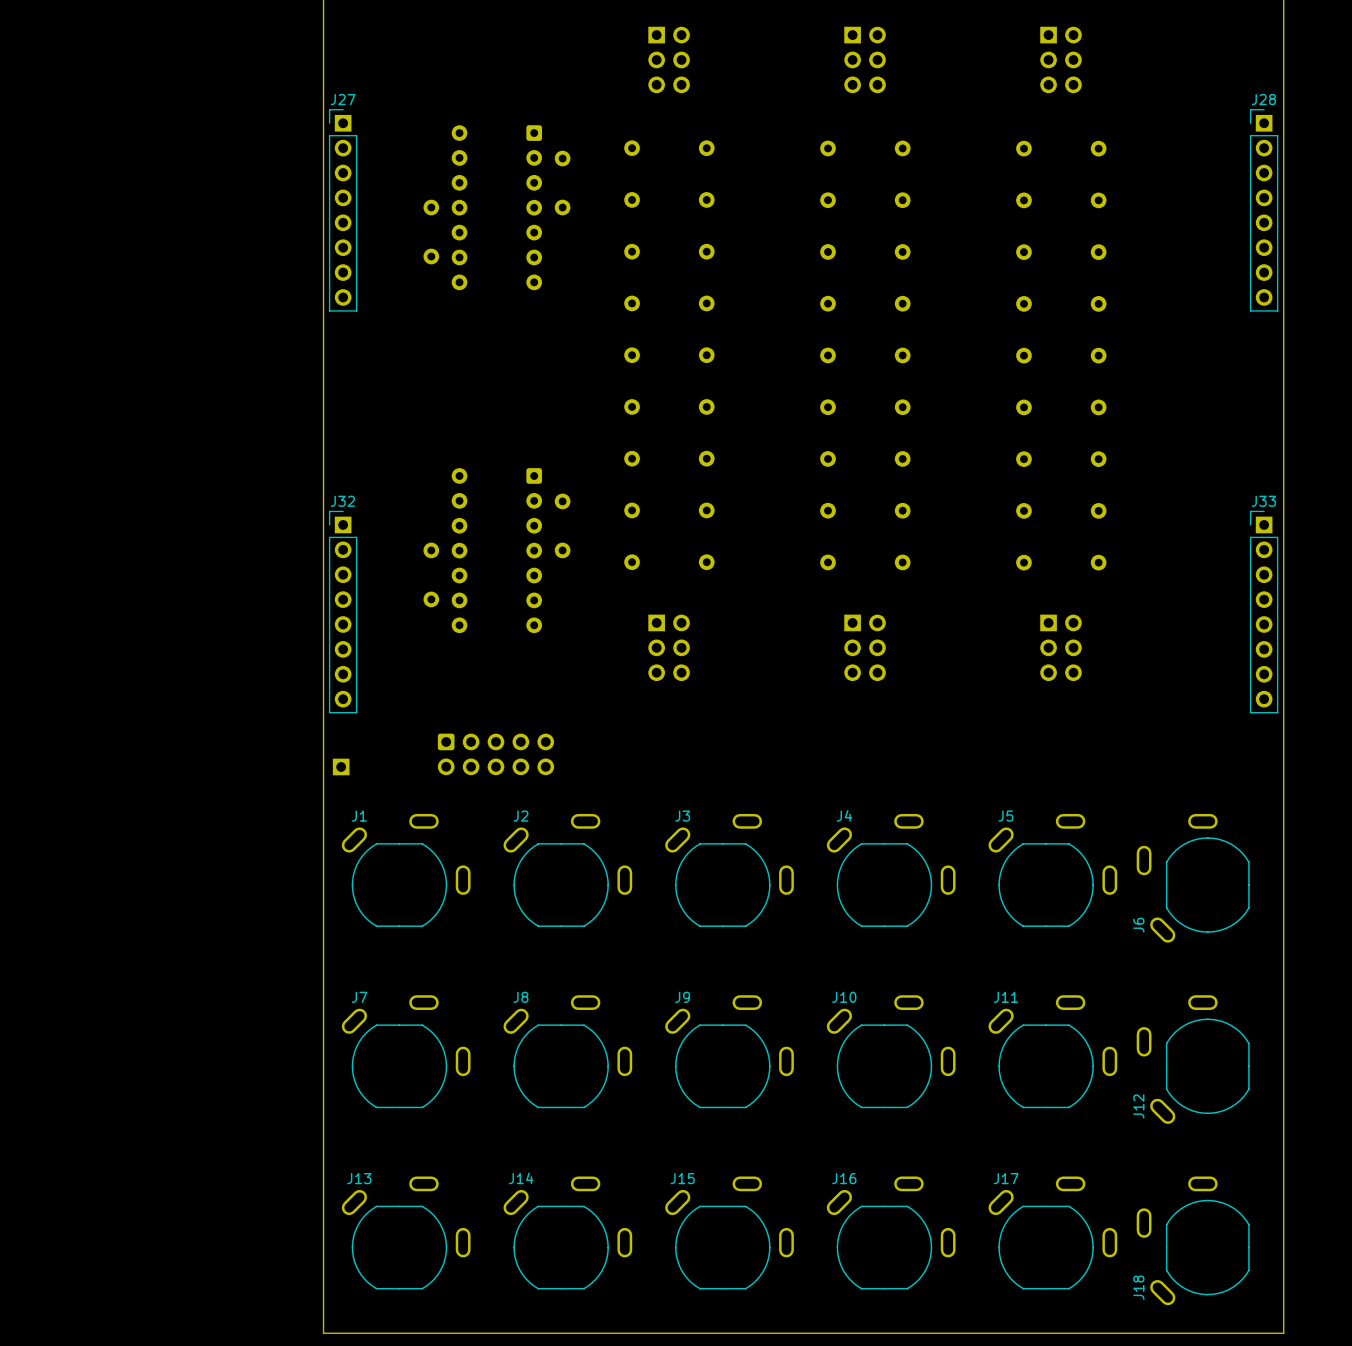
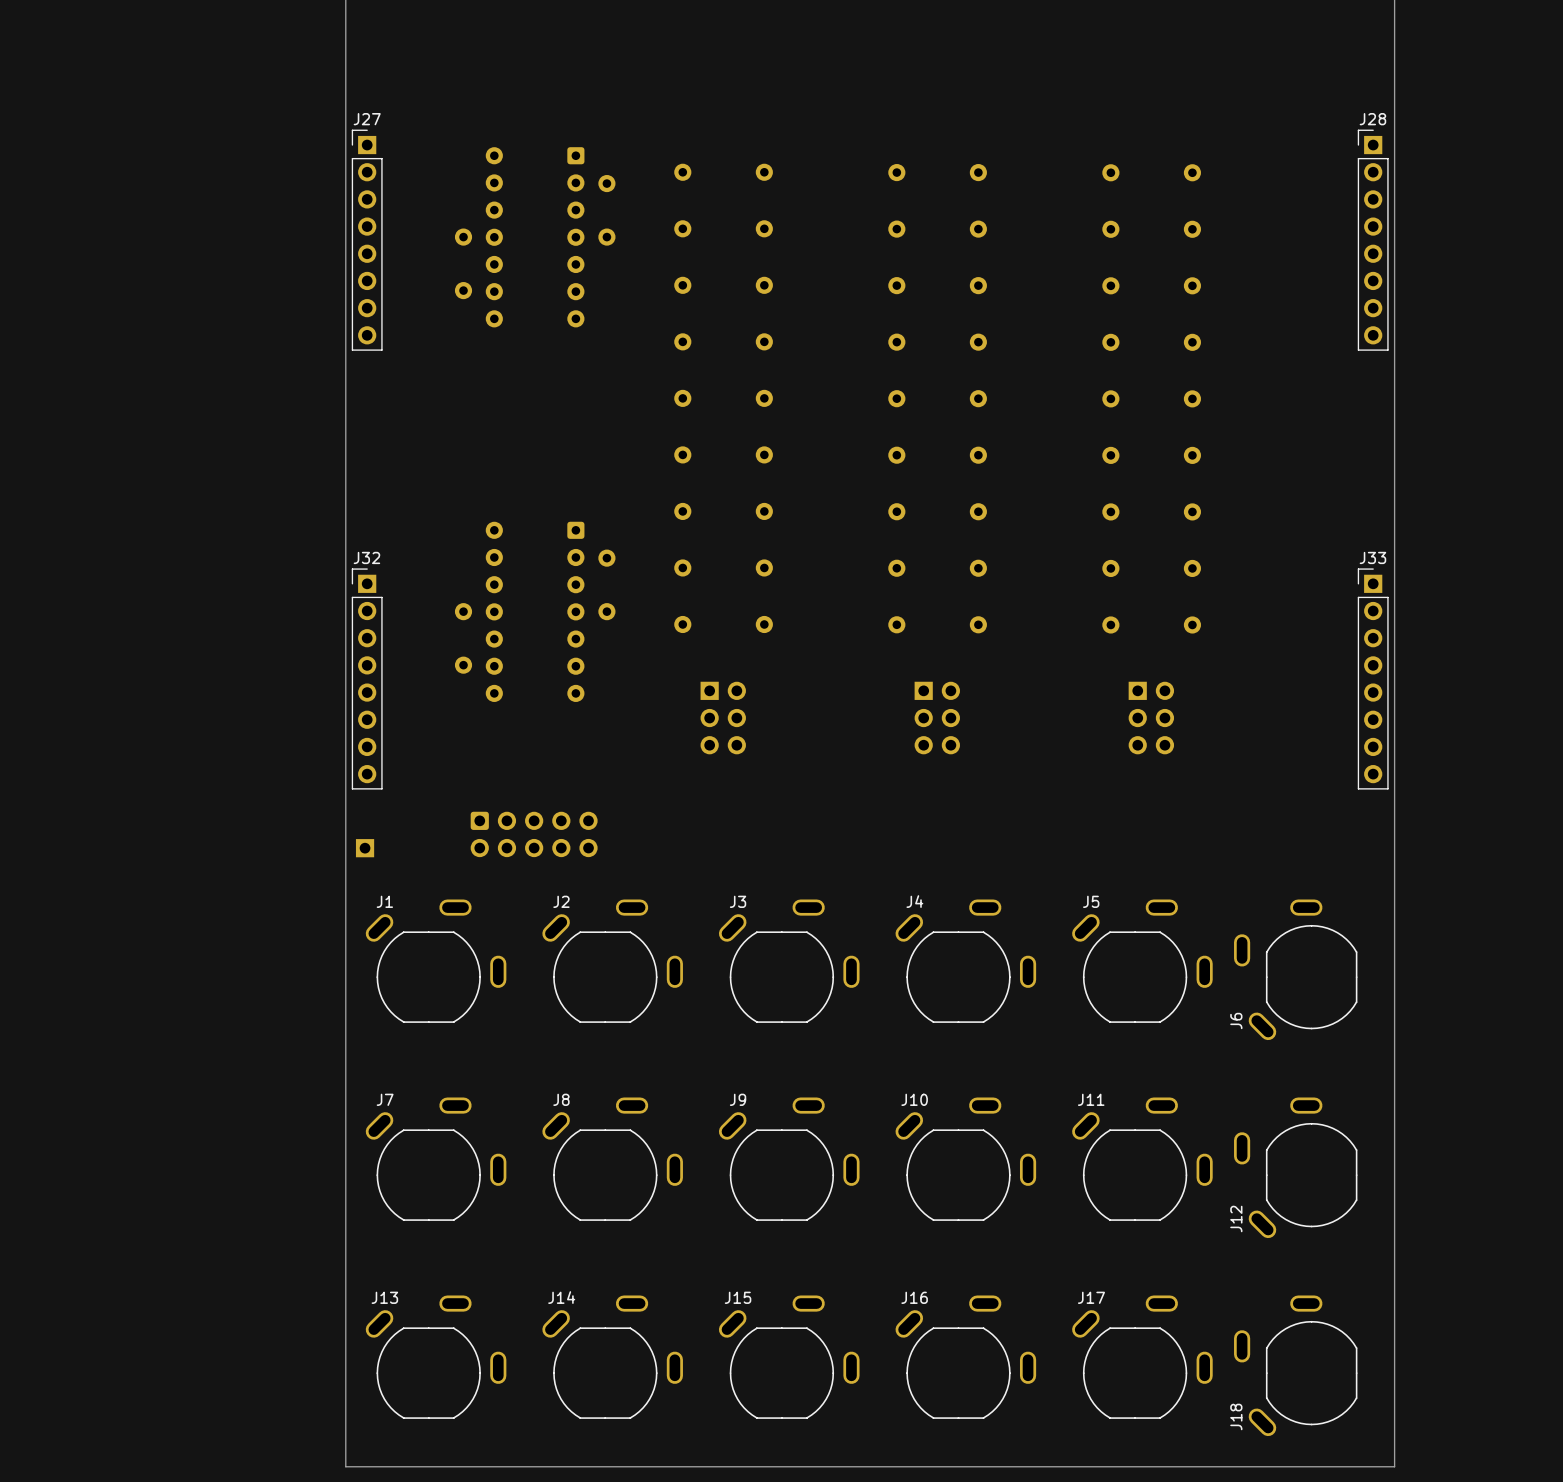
part: (669, 59) -> none
part: (865, 59) -> none
part: (1061, 59) -> none

